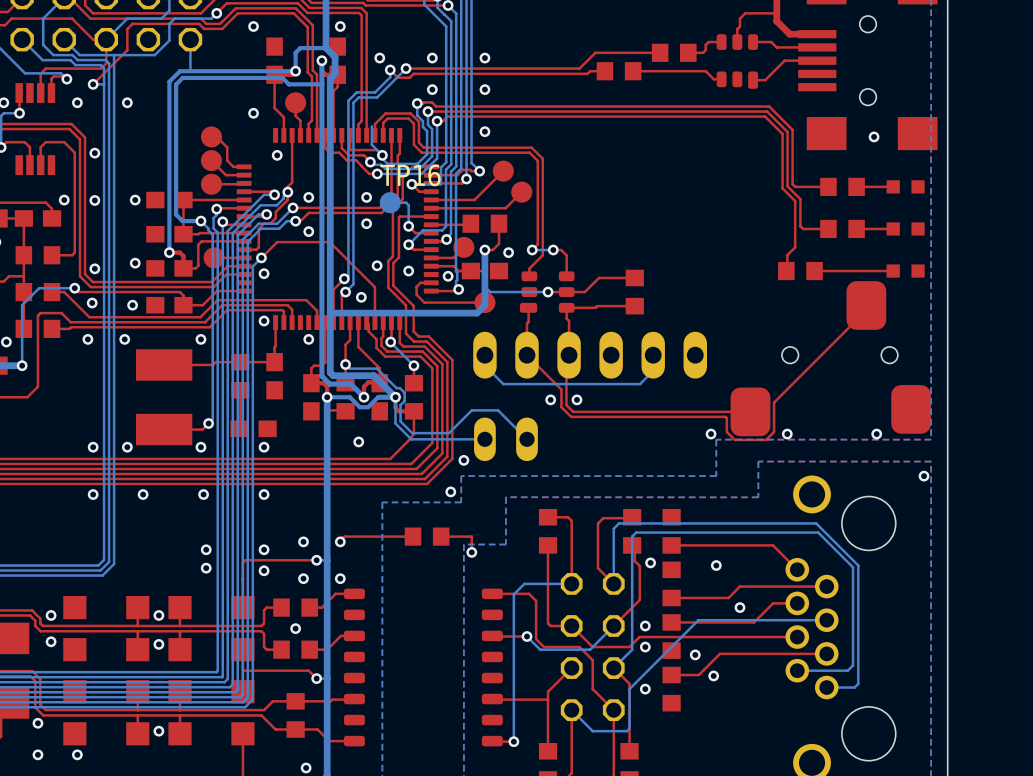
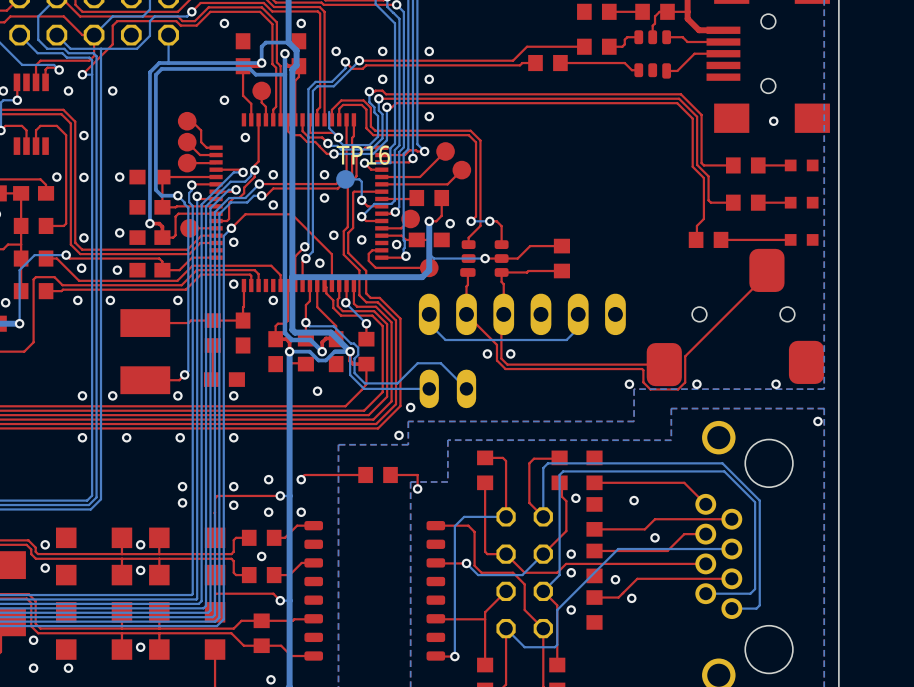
part: none -> (596, 11)
top track: none -> (642, 11) (609, 11)
part: none -> (655, 11)

